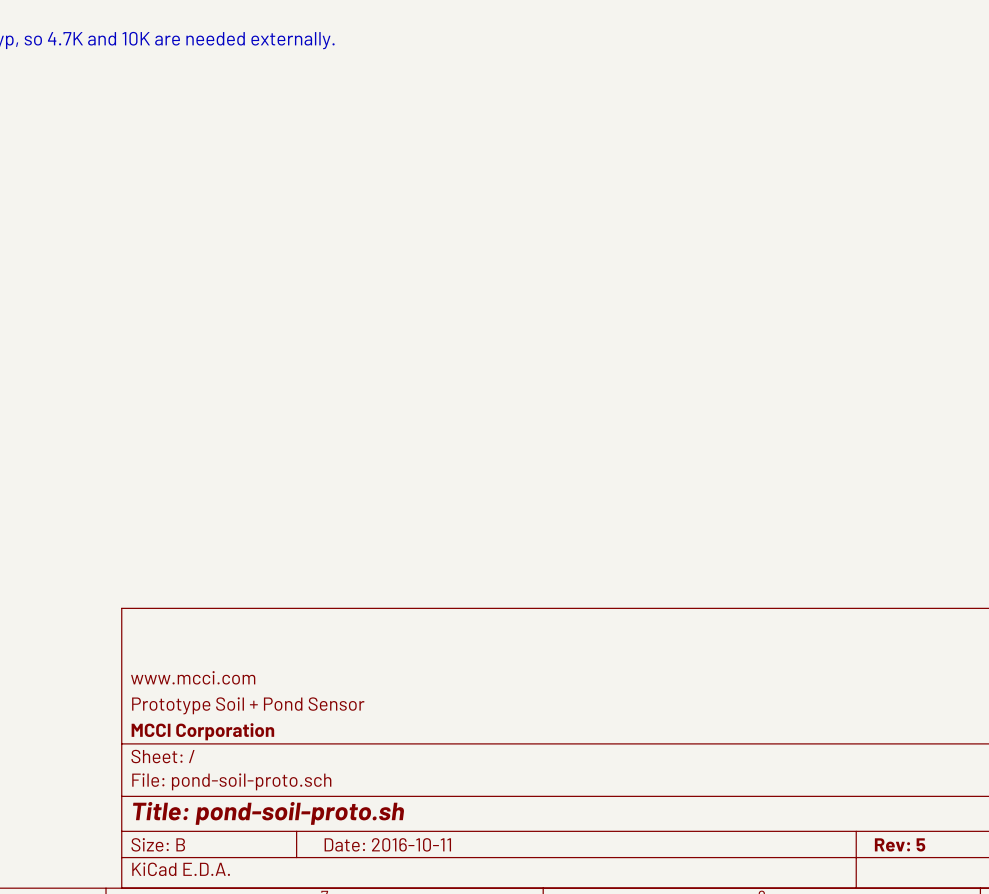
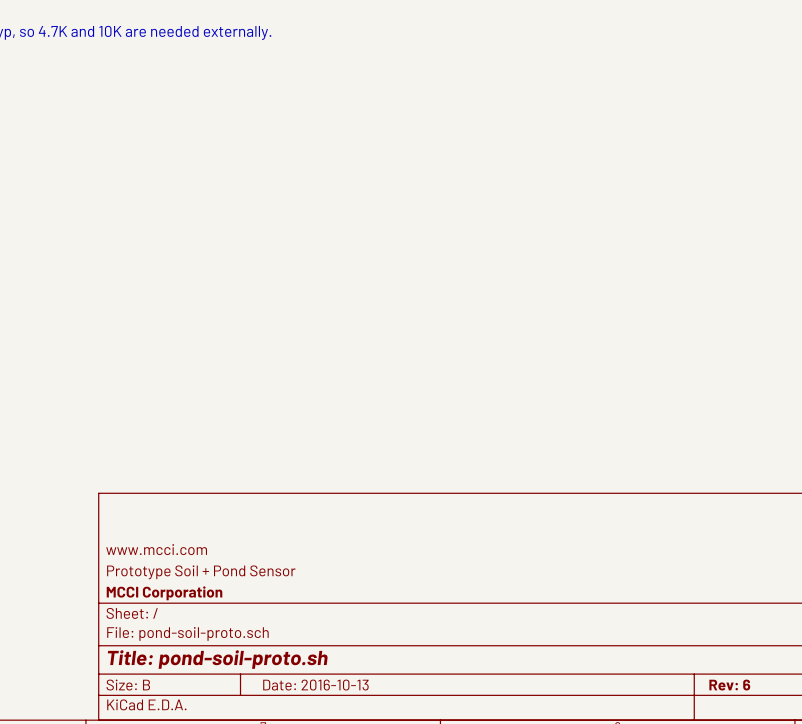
title block: Date: 2016-10-11 (387, 844) -> Date: 2016-10-13 (315, 685)
title block: Rev: 5 (900, 844) -> Rev: 6 (729, 685)

